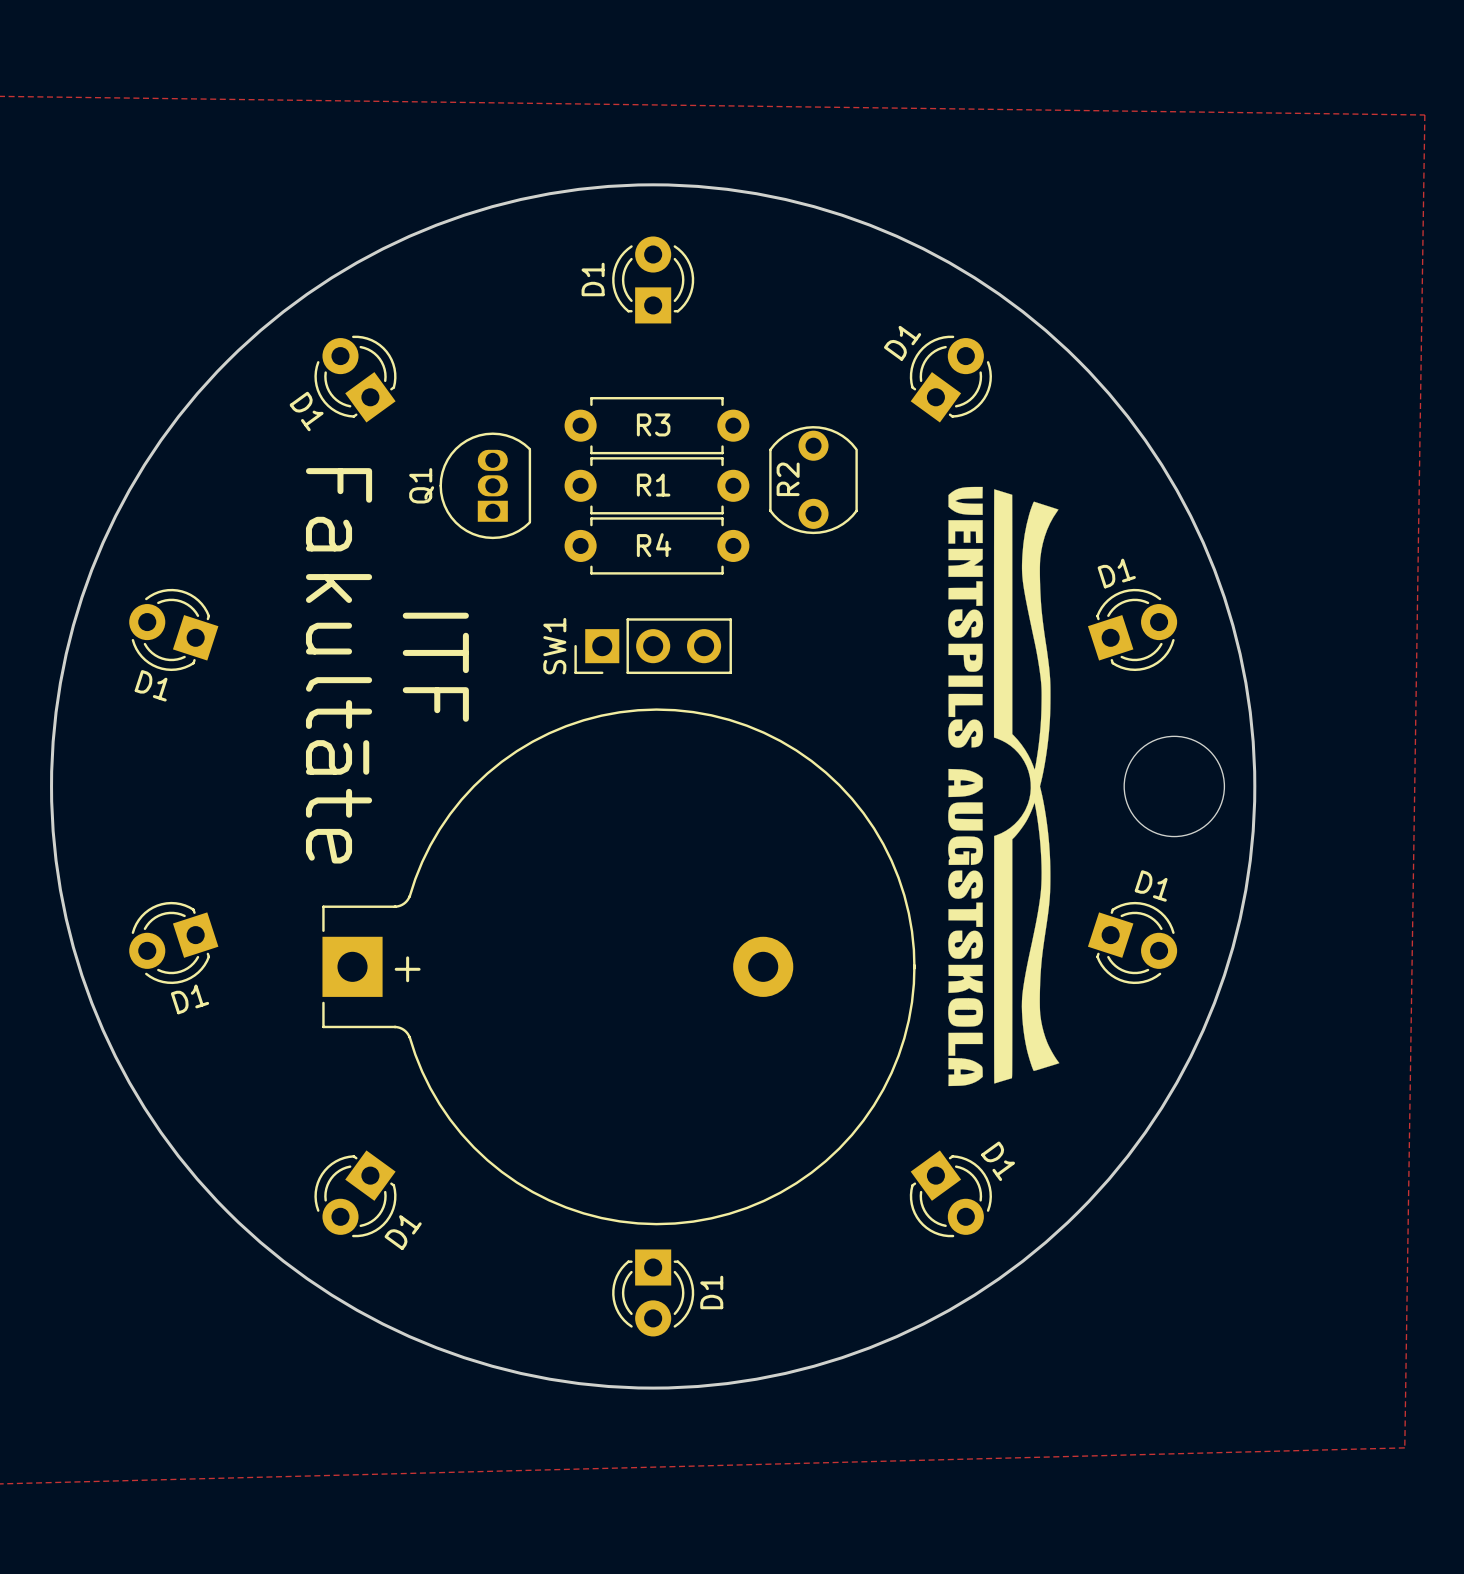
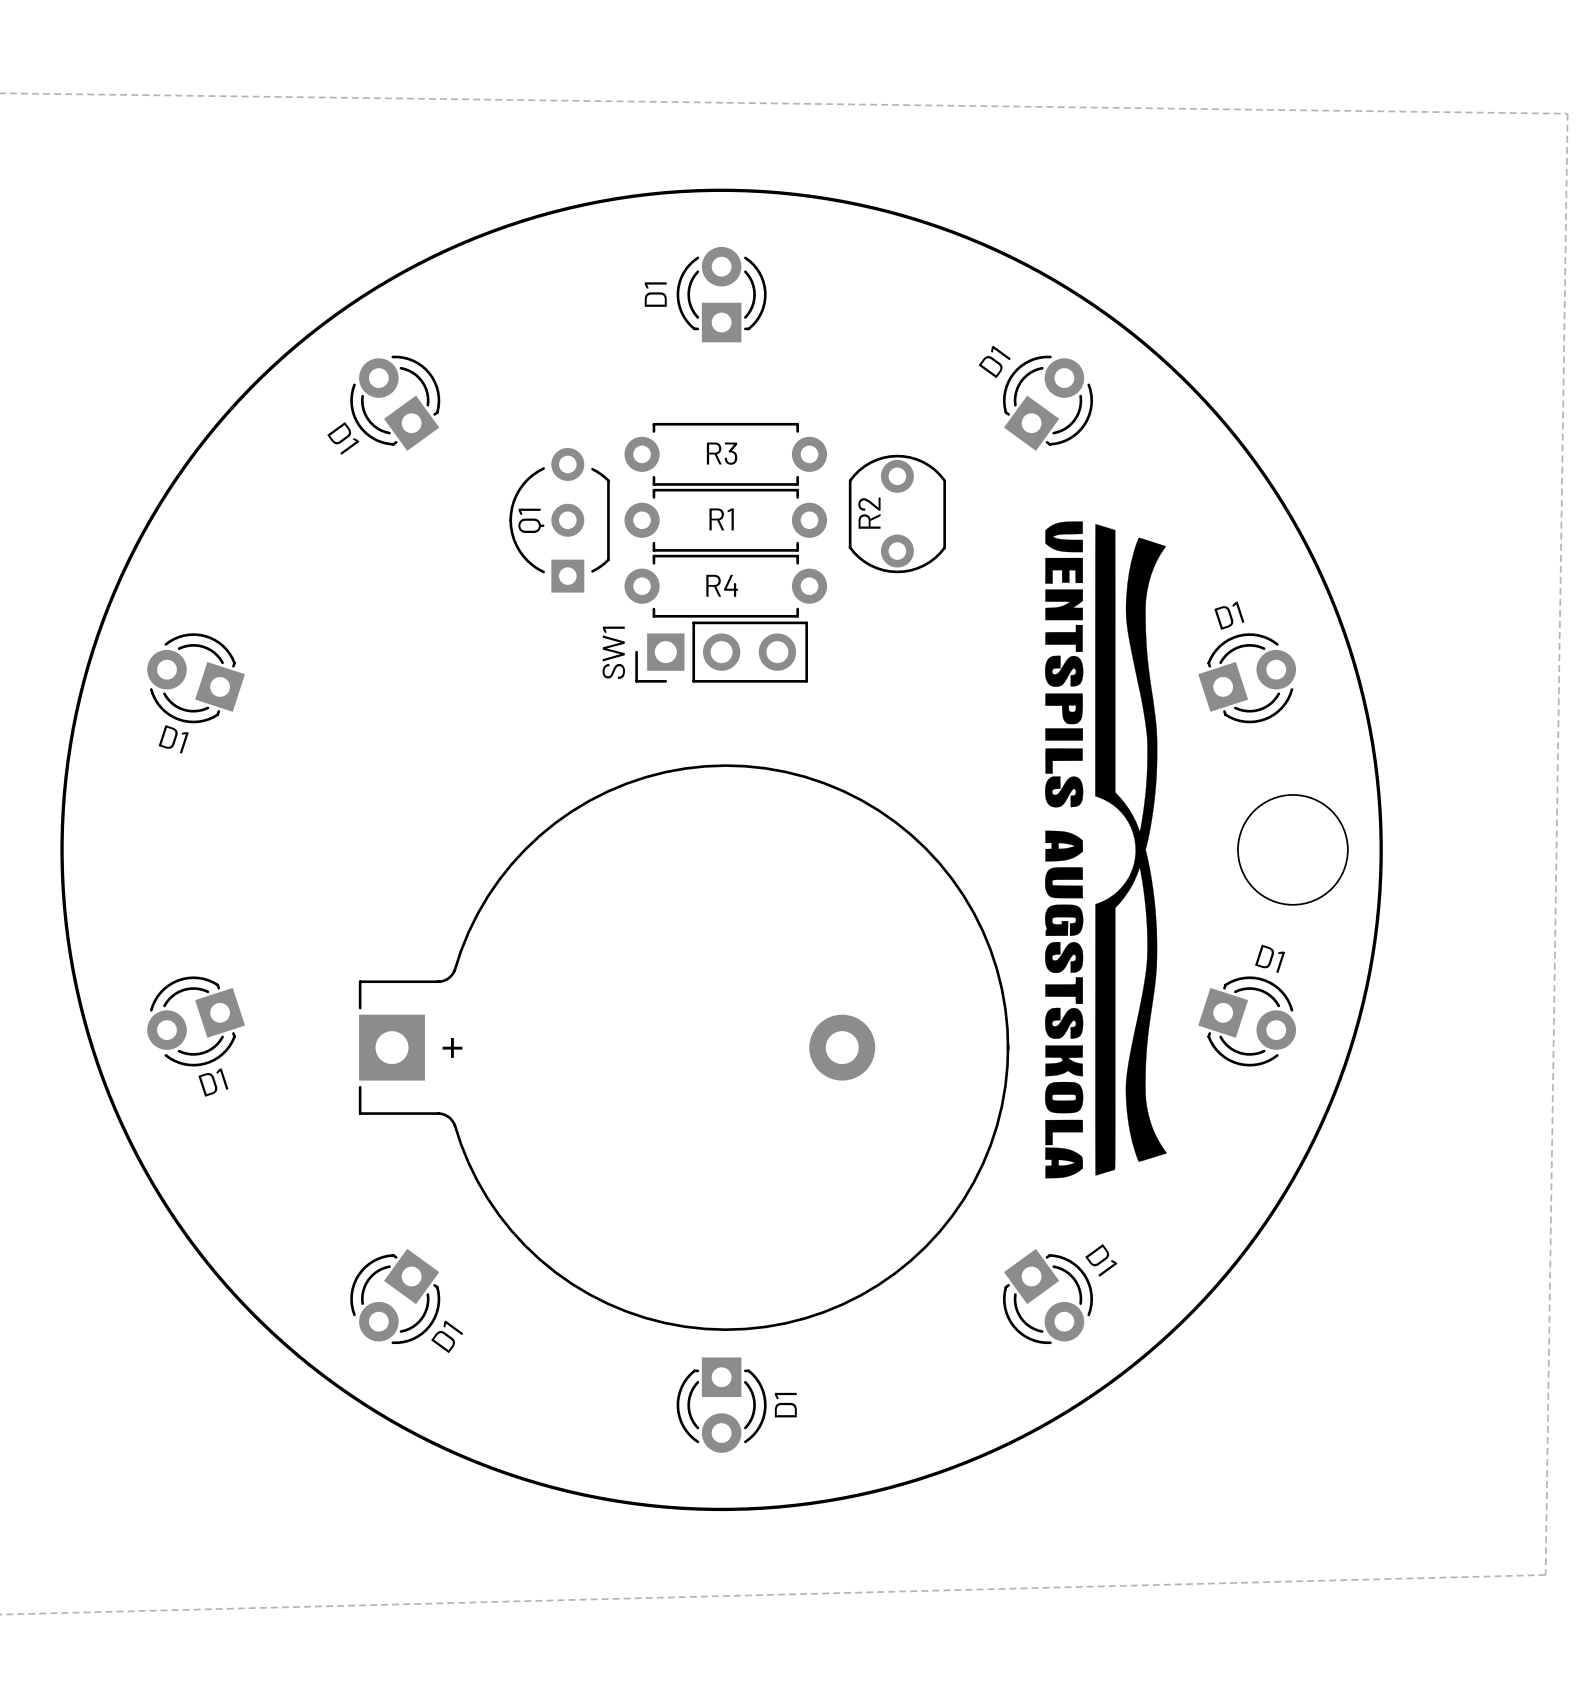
Q1 footprint: [439, 432, 532, 540] -> [509, 447, 610, 593]
SW1 position: (653, 646) -> (721, 652)
text: Fakultāte (339, 665) -> none
text: ITF (435, 667) -> none

